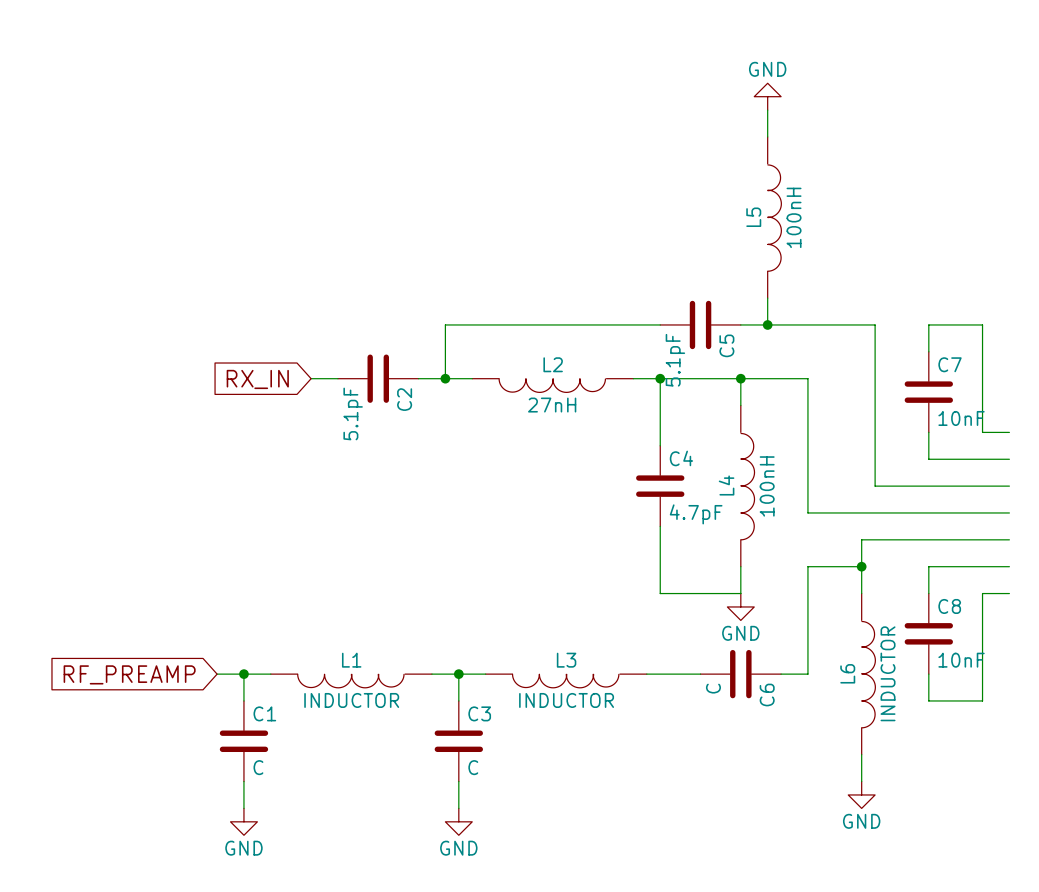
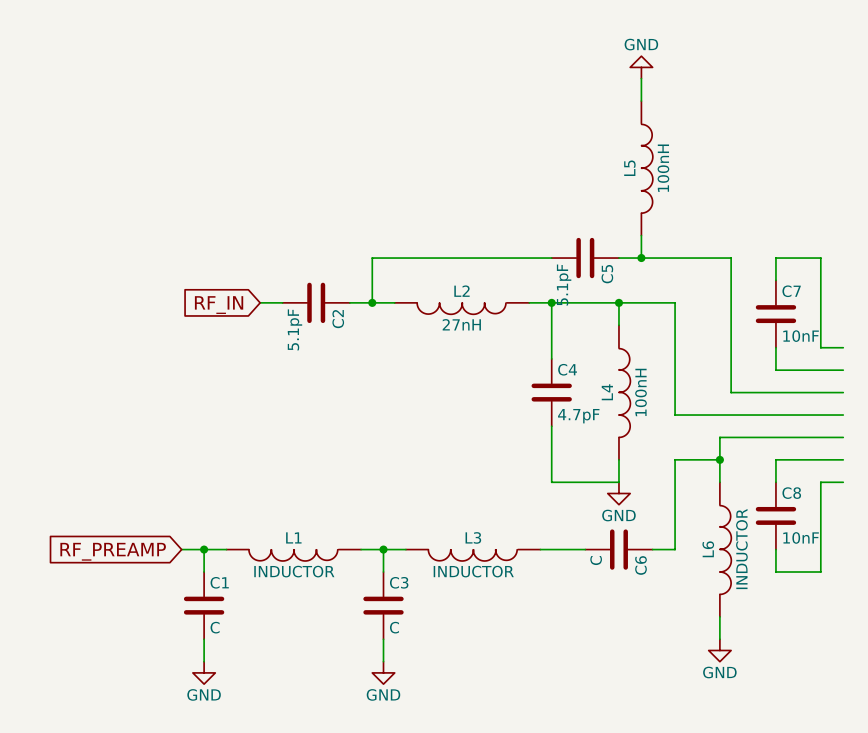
global label: RX_IN (257, 379) -> RF_IN (219, 305)

